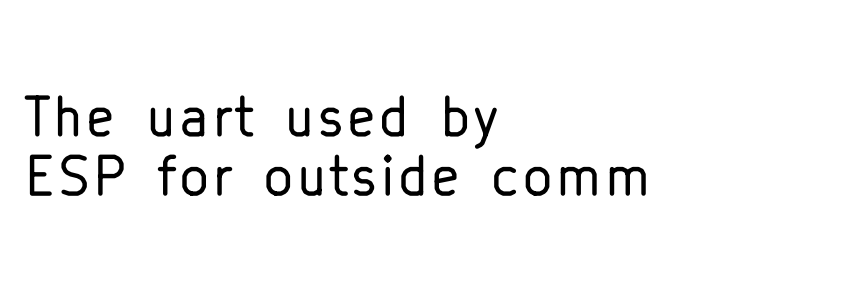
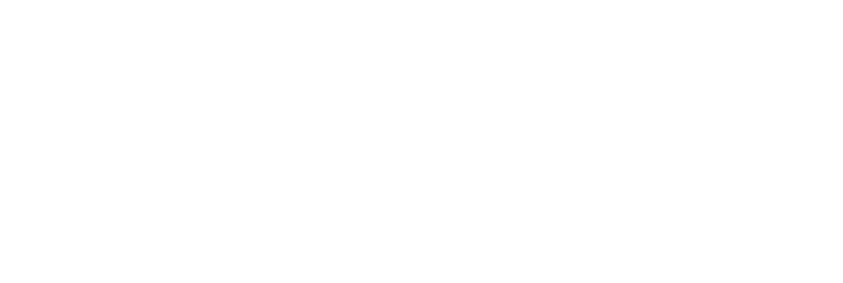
text: The uart used by (260, 122) -> none
text: ESP for outside comm (337, 175) -> none

